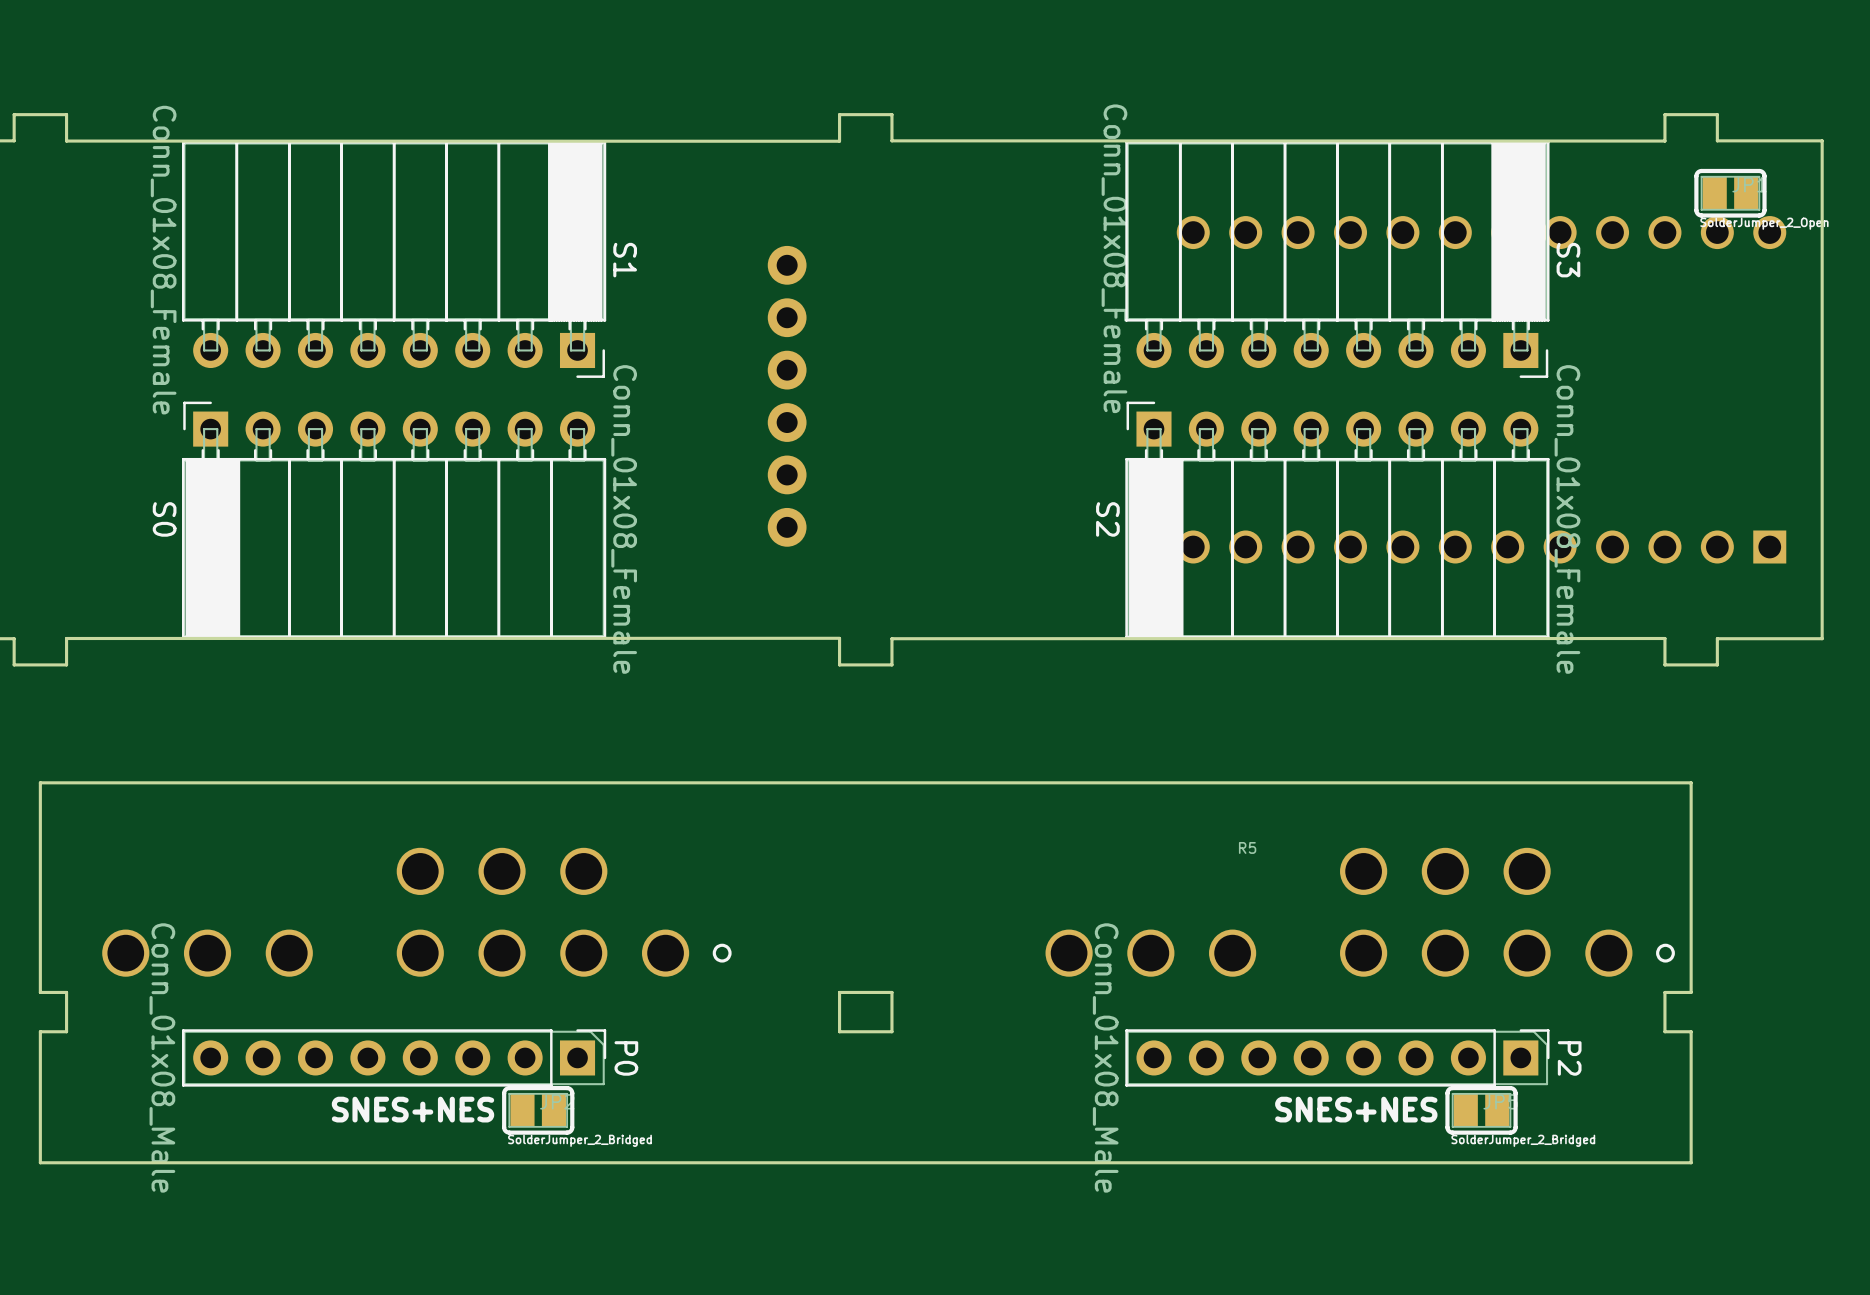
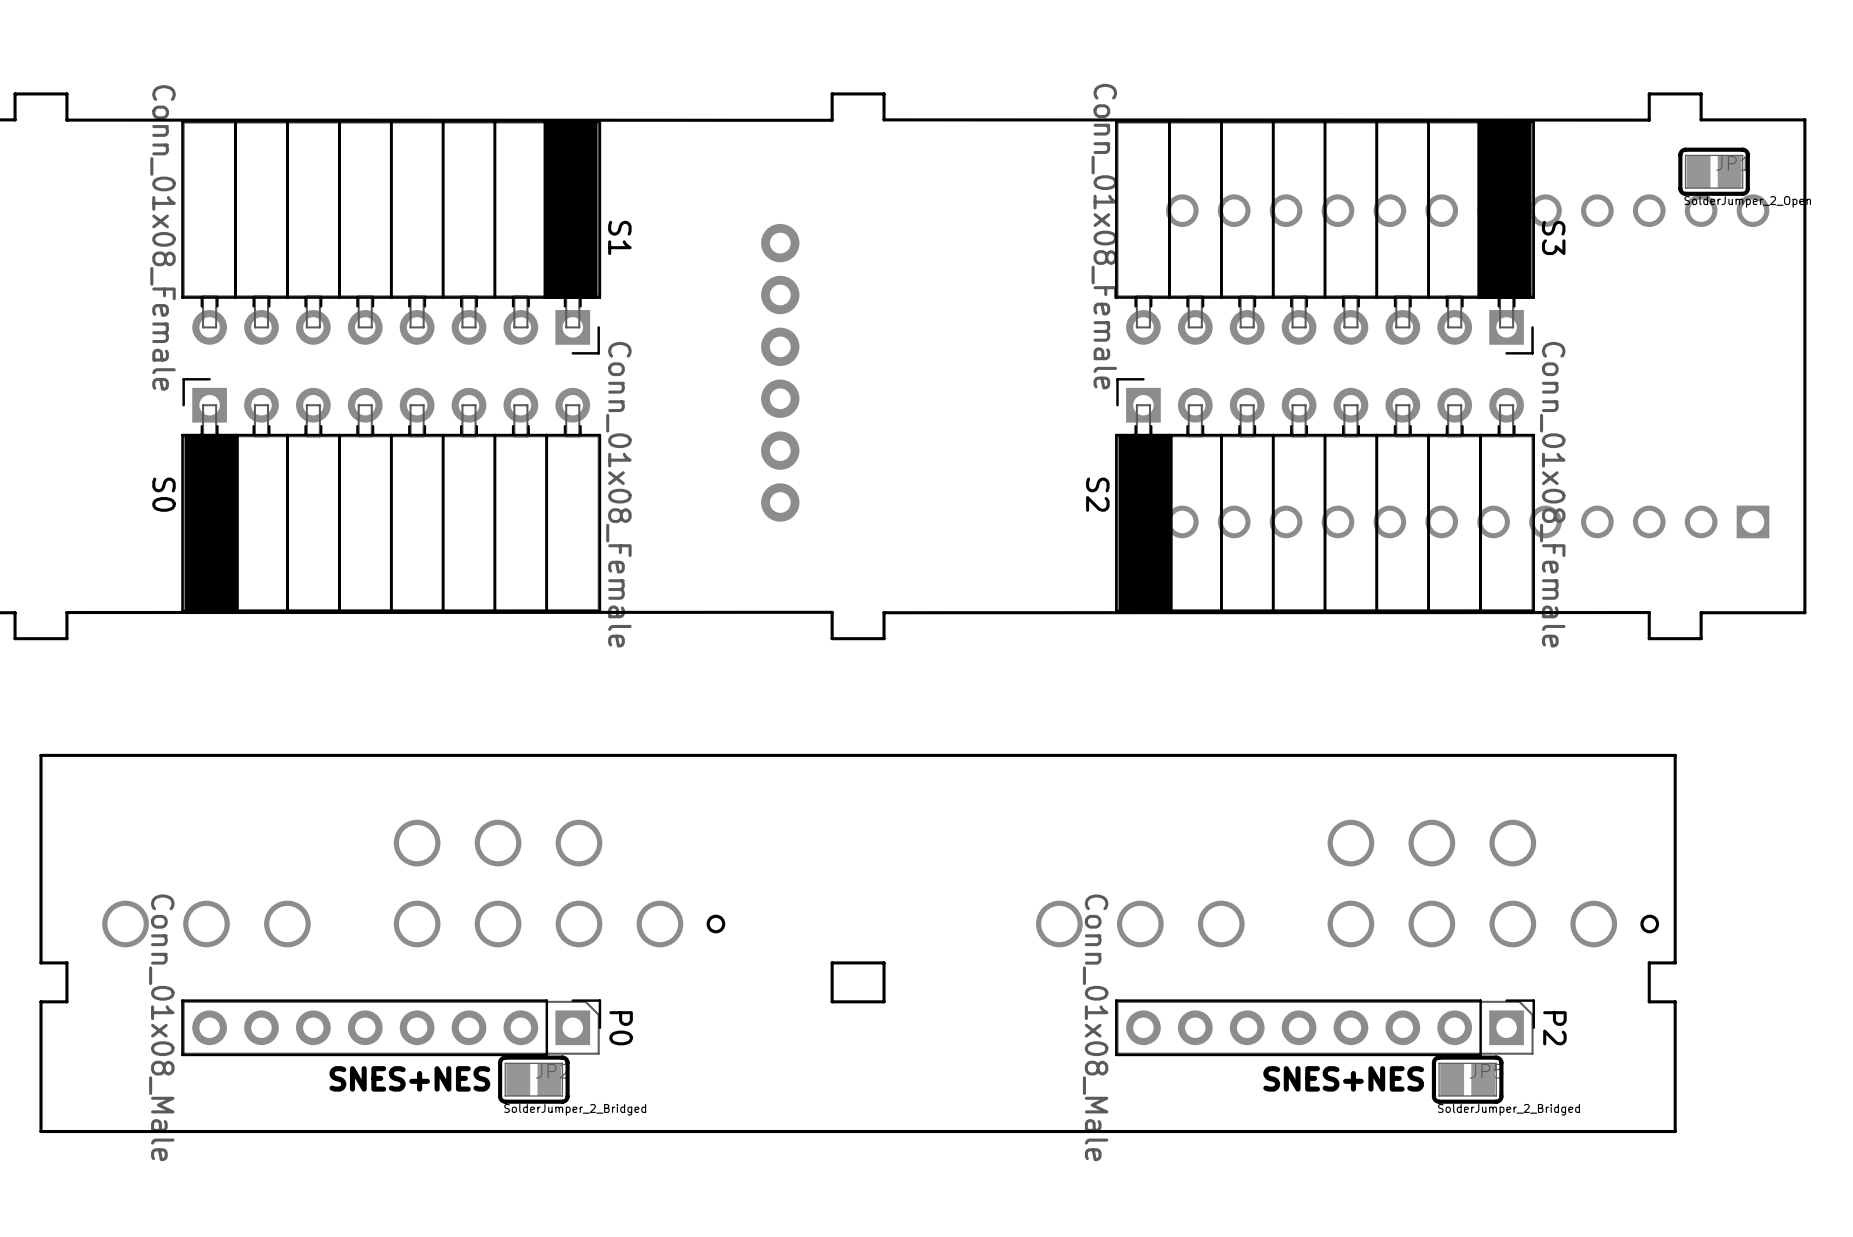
R5: (1247, 847) -> none

